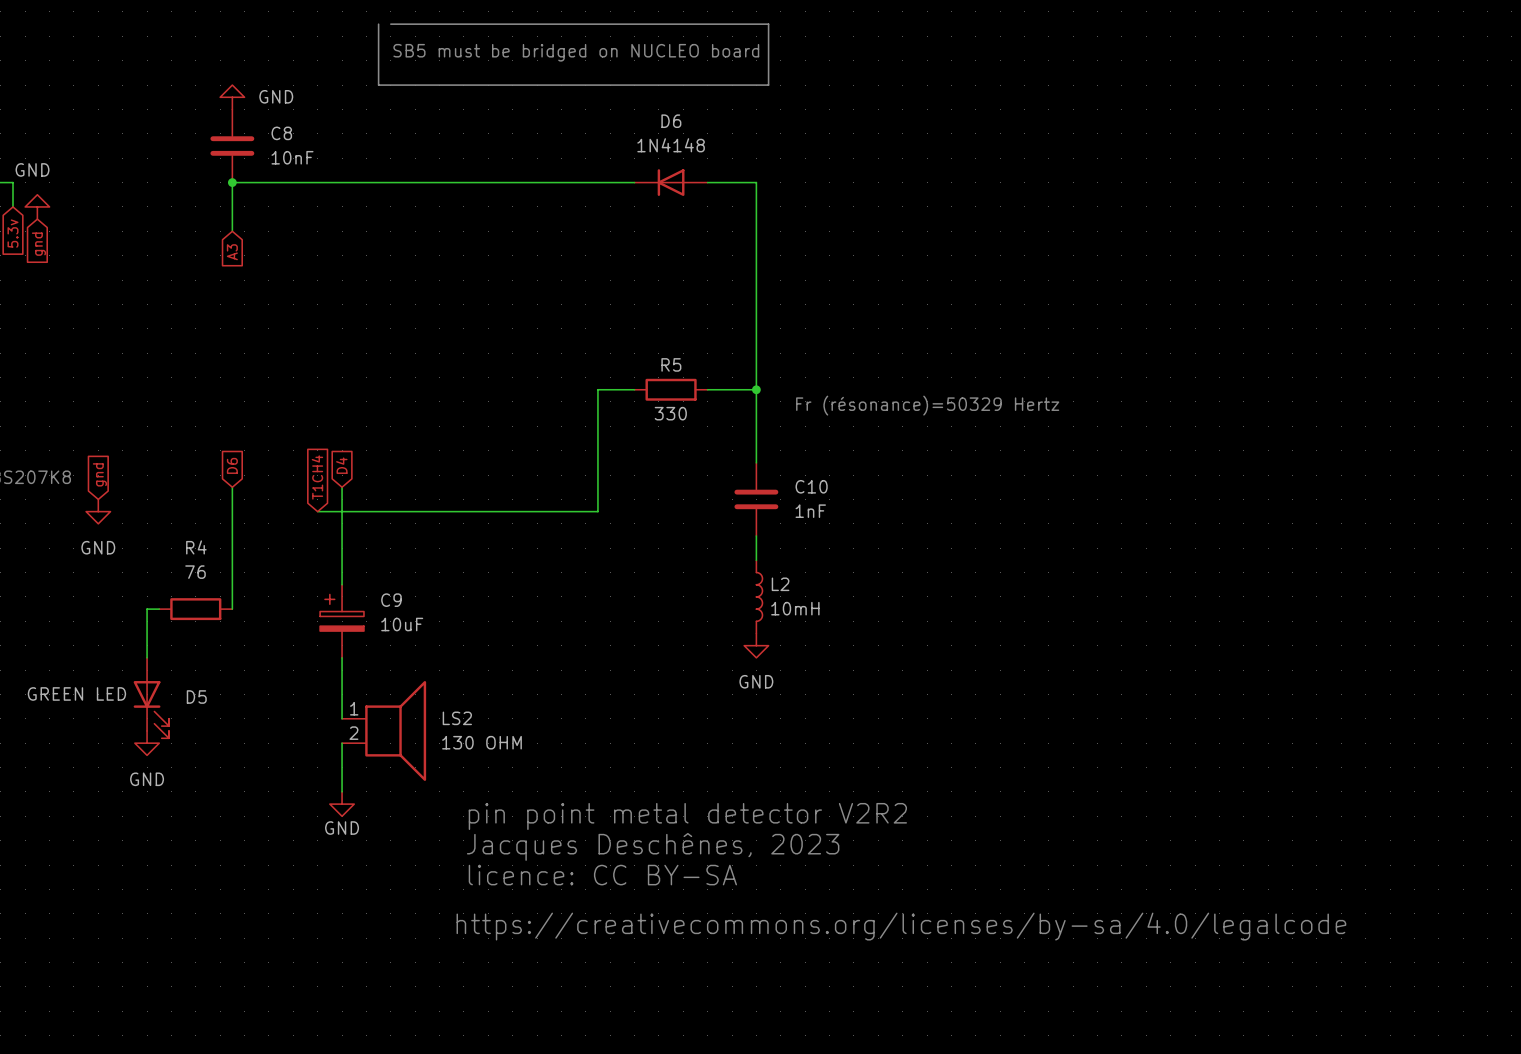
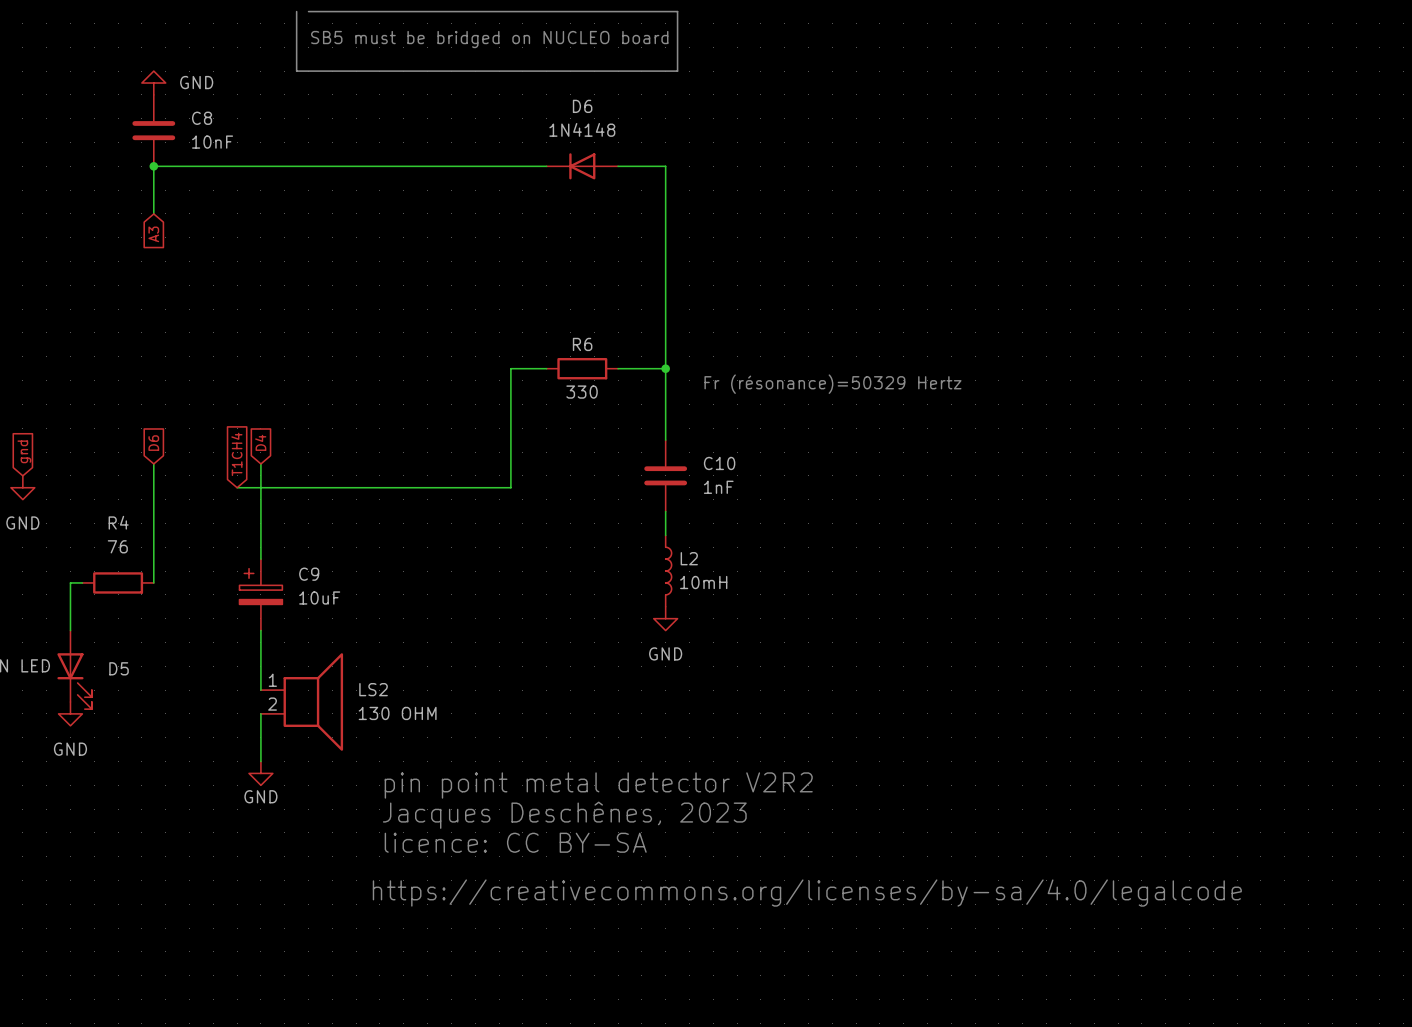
R5 name: R5 (671, 364) -> R6 (582, 344)

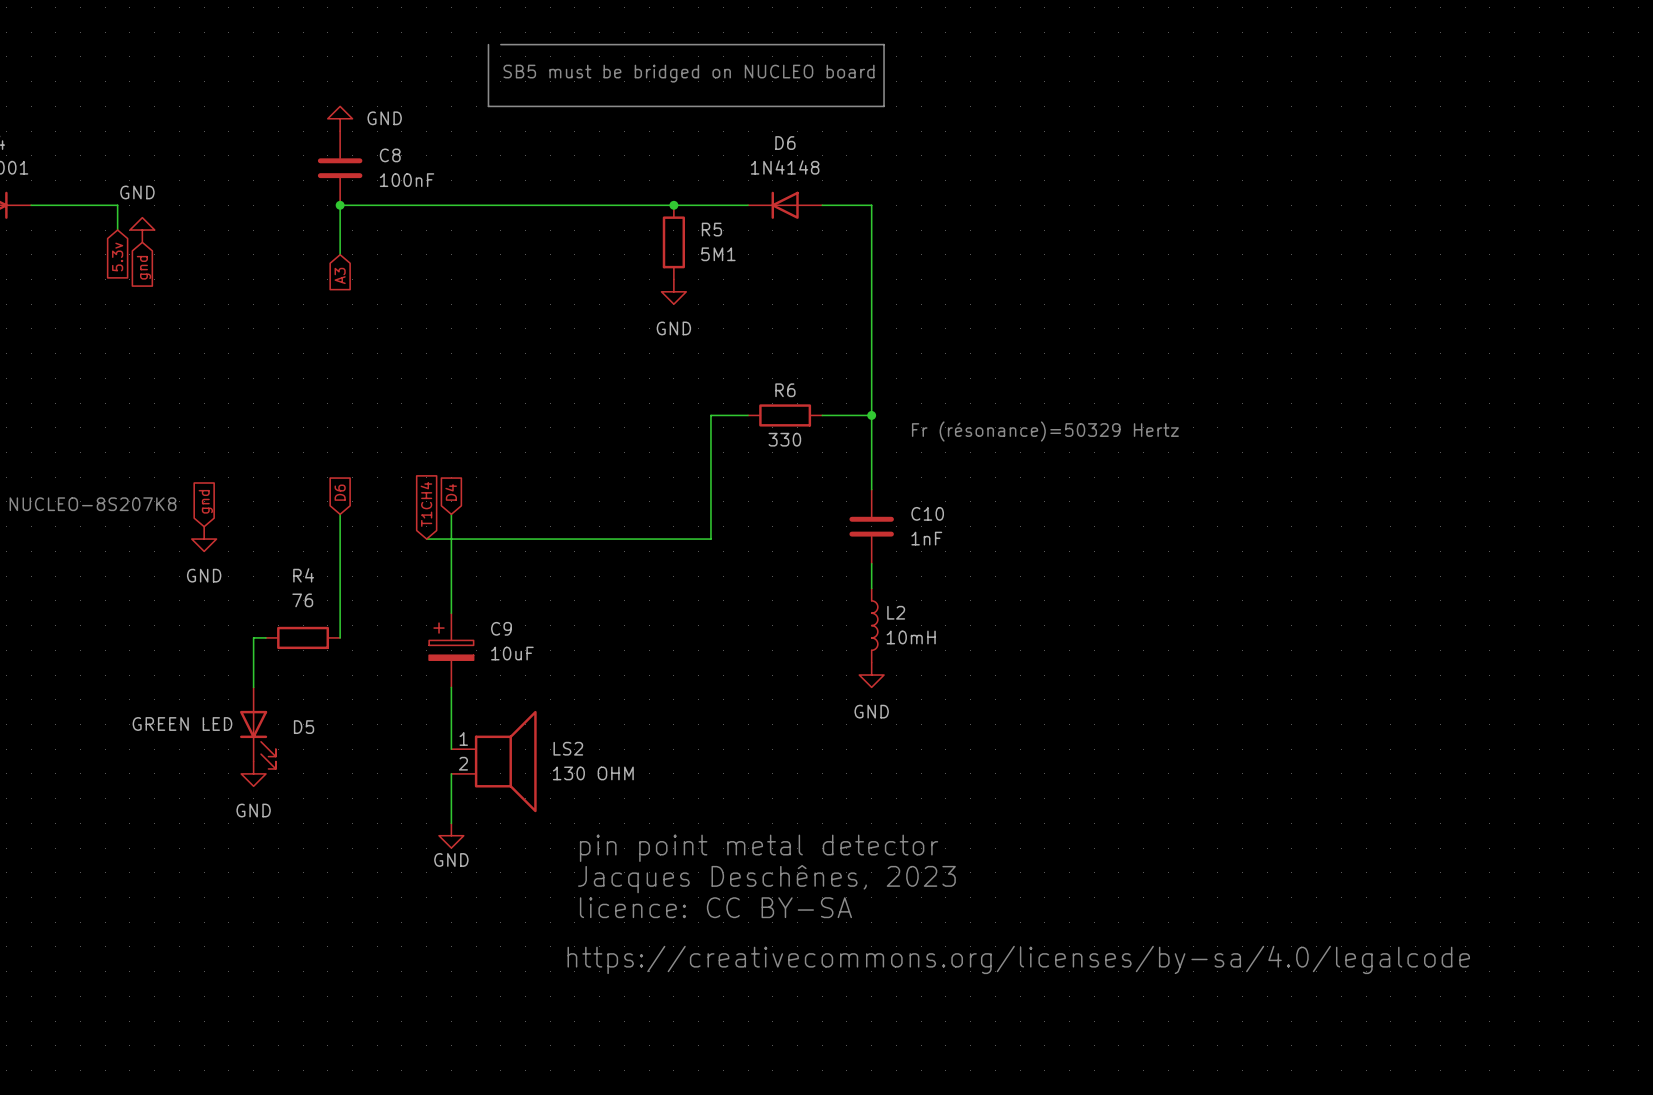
C8 value: 10nF (212, 142) -> 100nF (407, 180)
junction: none -> (673, 205)
R5: none -> 5M1 (673, 242)
power symbol: none -> GND (673, 291)
text: pin point metal detector V2R2 (598, 785) -> pin point metal detector (759, 848)

